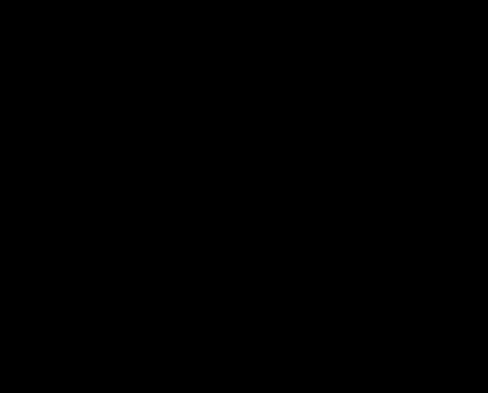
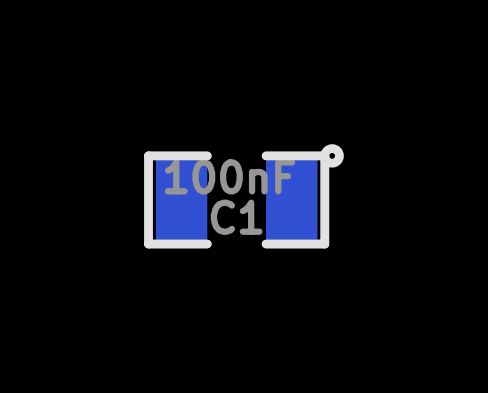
C1: none -> 100nF (244, 196)

